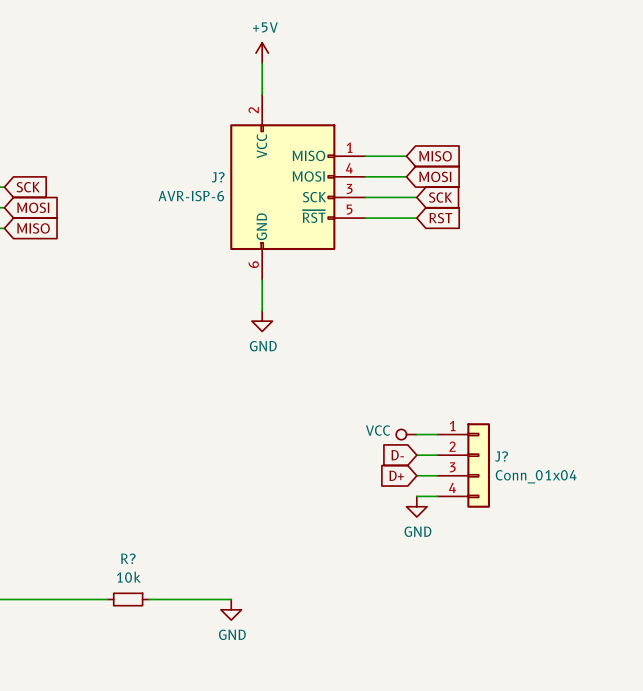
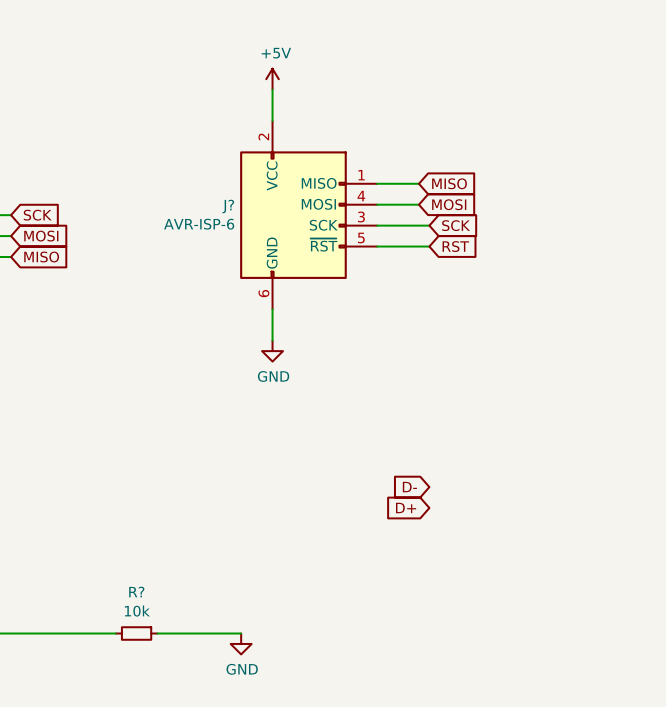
power symbol: VCC (406, 434) -> none
wire: (416, 434) (437, 434) -> none
wire: (416, 455) (437, 455) -> none
J?: Conn_01x04 (463, 465) -> none
wire: (416, 475) (437, 475) -> none
wire: (416, 496) (437, 496) -> none
power symbol: GND (416, 506) -> none

